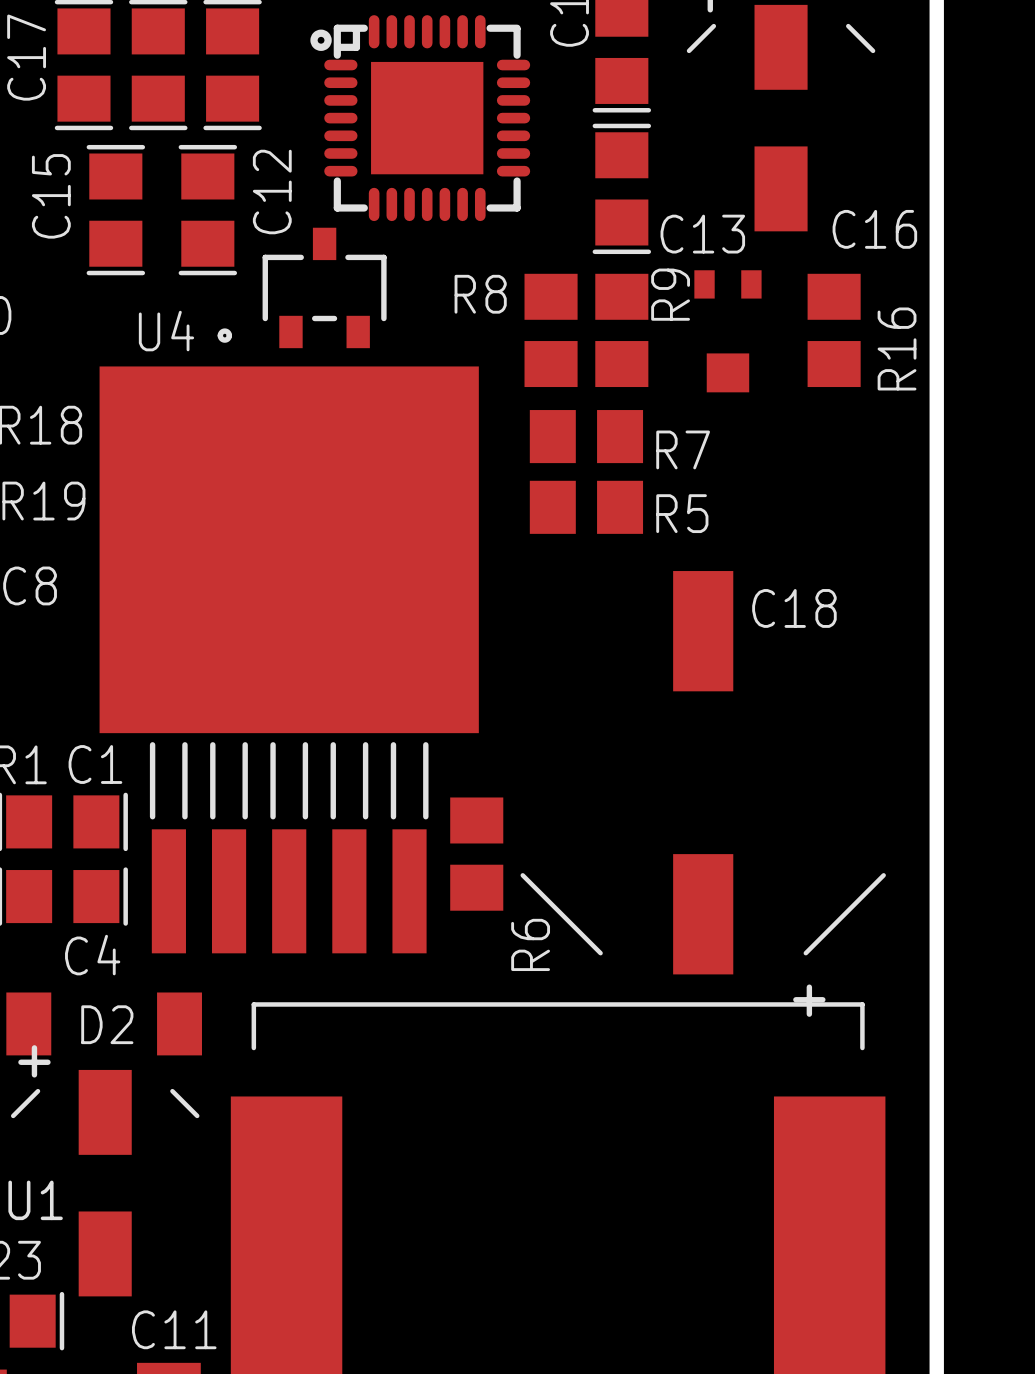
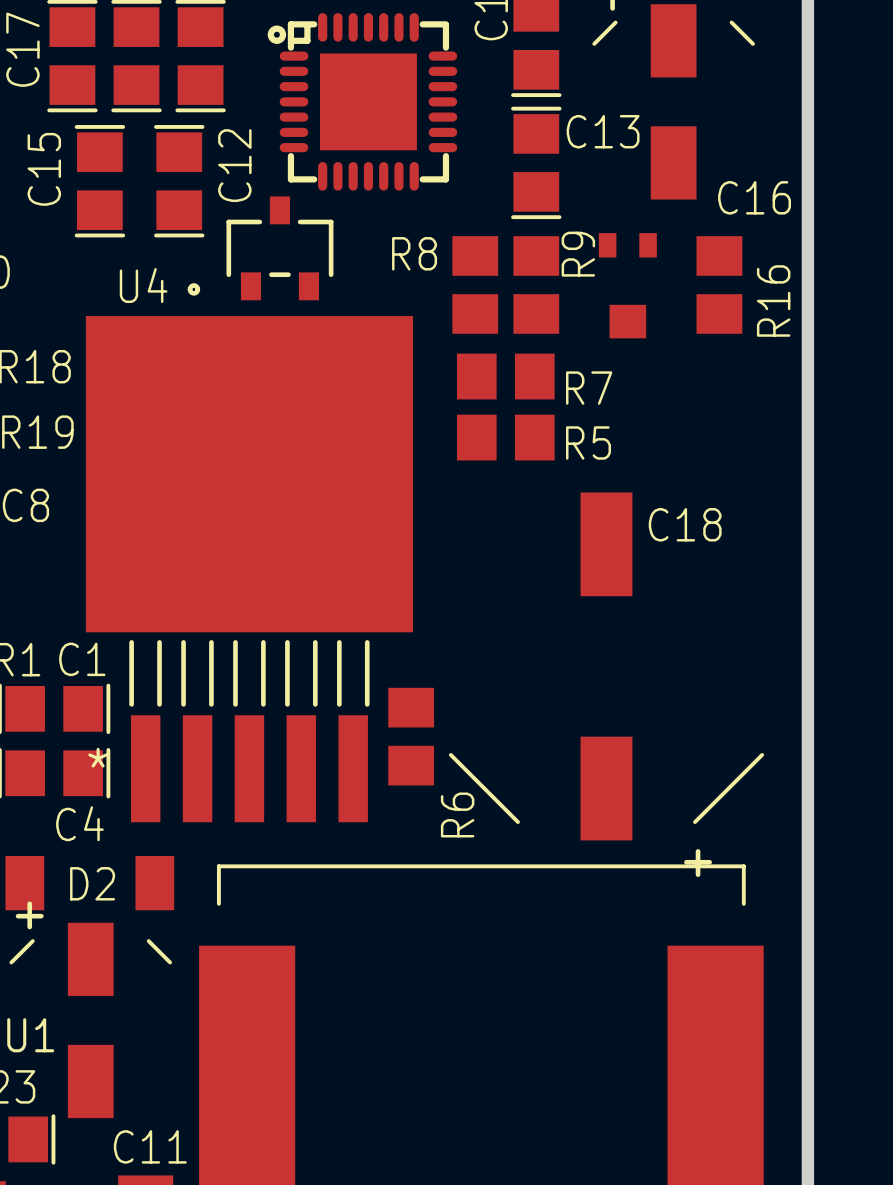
C13 name position: C13 (702, 234) -> C13 (603, 131)
U4 text: none -> * (98, 757)

